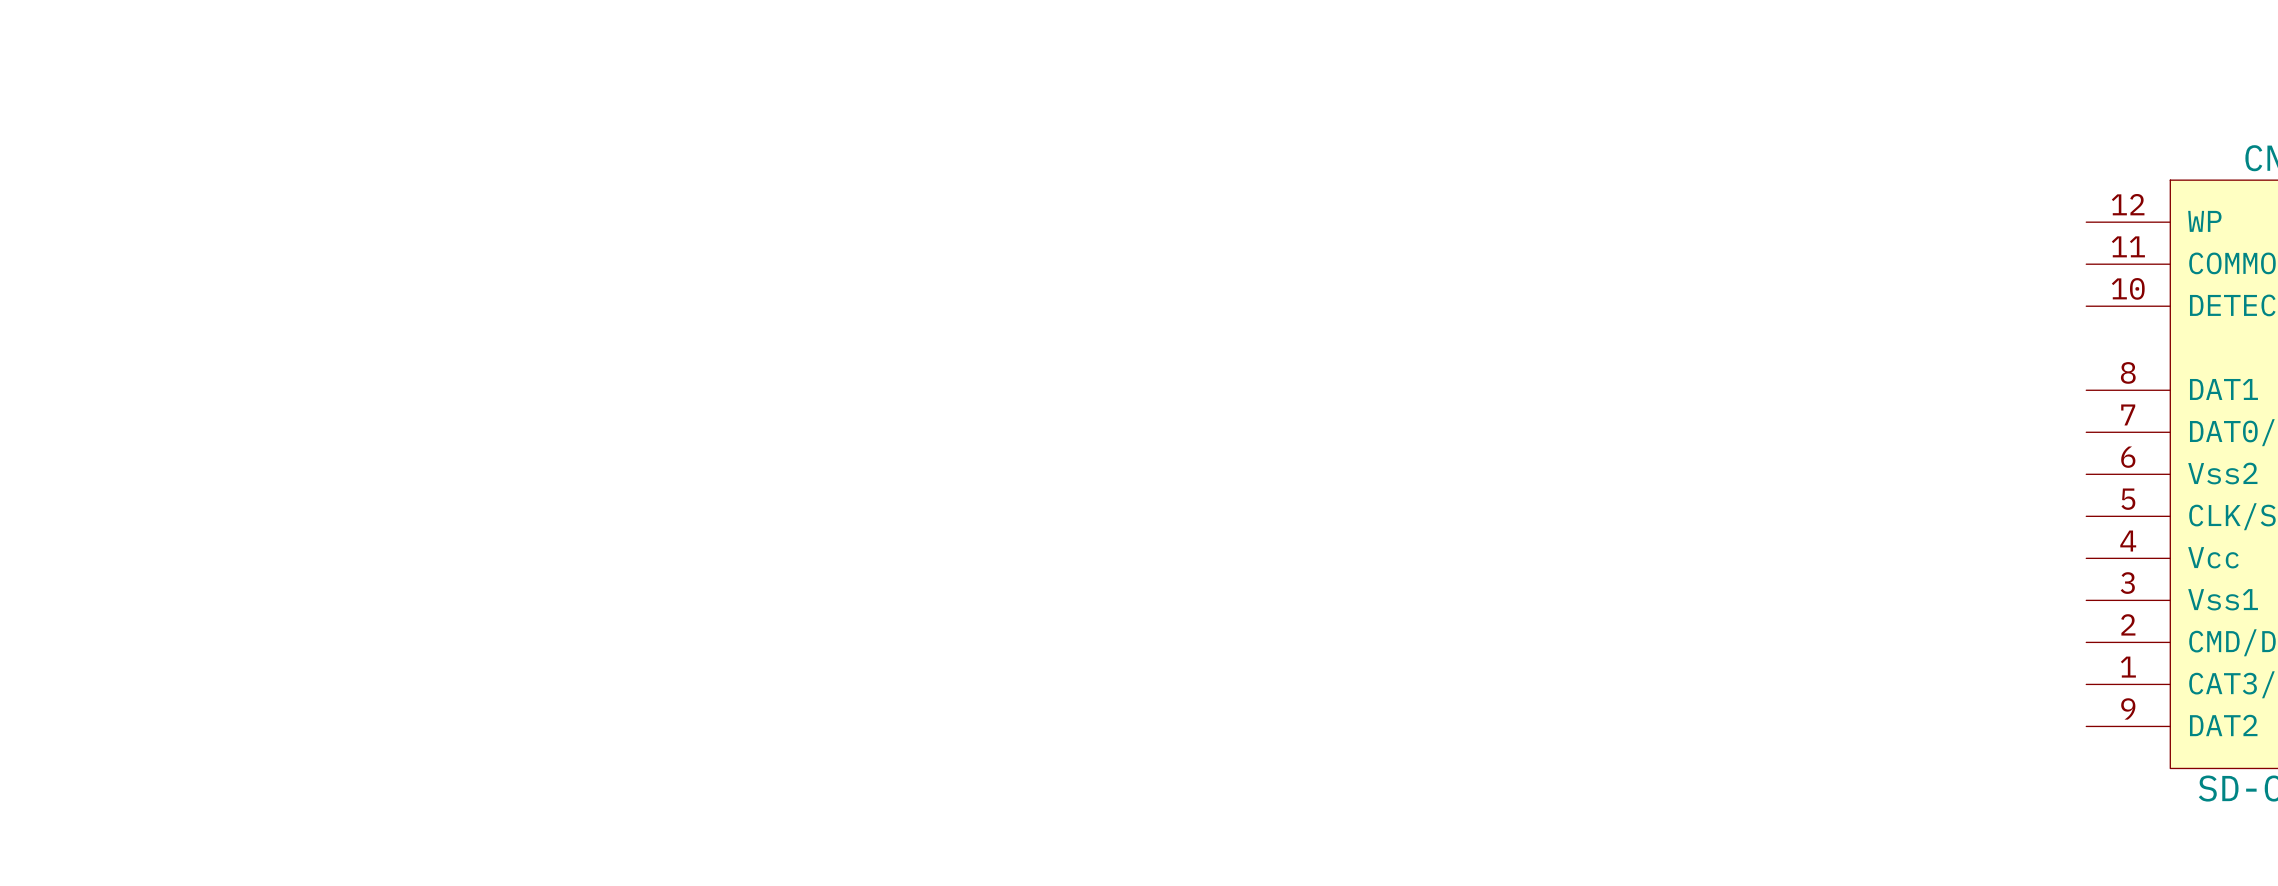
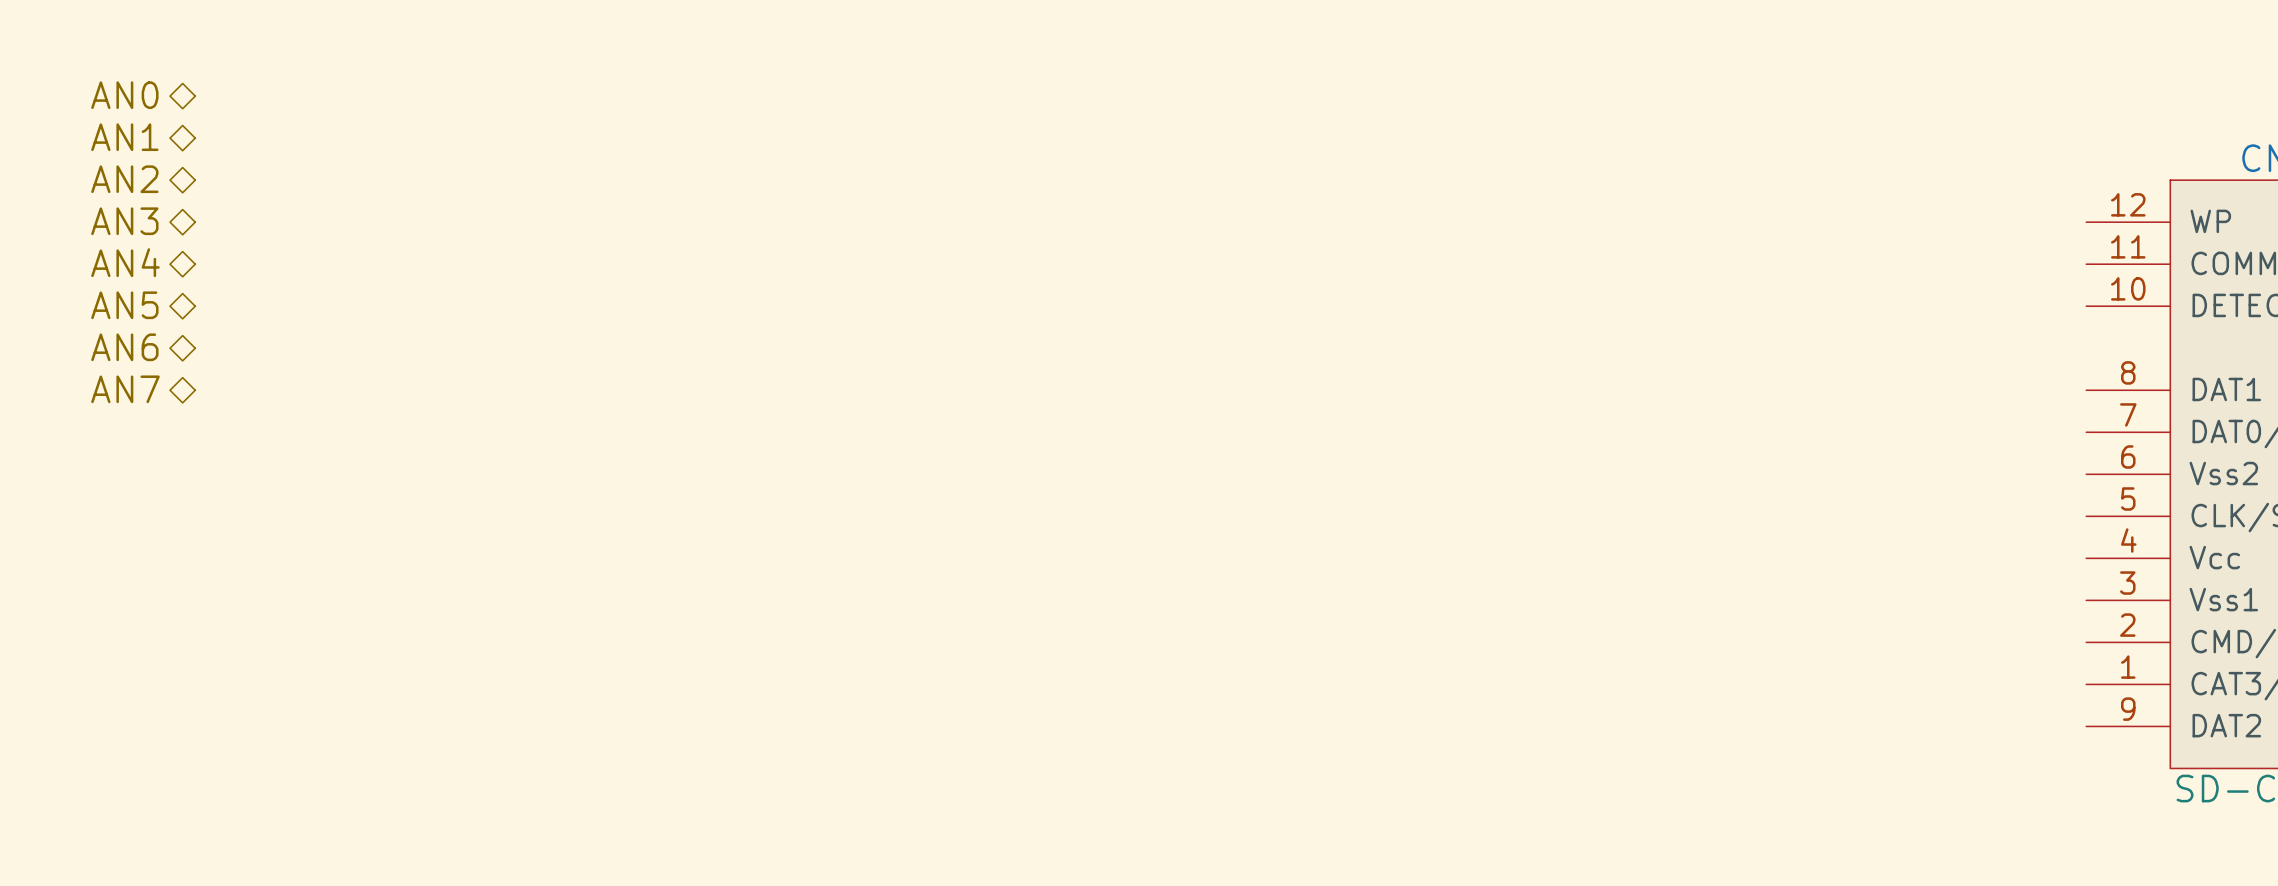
hierarchical label: none -> AN0 (124, 95)
hierarchical label: none -> AN1 (124, 137)
hierarchical label: none -> AN2 (124, 179)
hierarchical label: none -> AN3 (124, 221)
hierarchical label: none -> AN4 (125, 262)
hierarchical label: none -> AN5 (124, 305)
hierarchical label: none -> AN6 (124, 347)
hierarchical label: none -> AN7 (125, 389)

